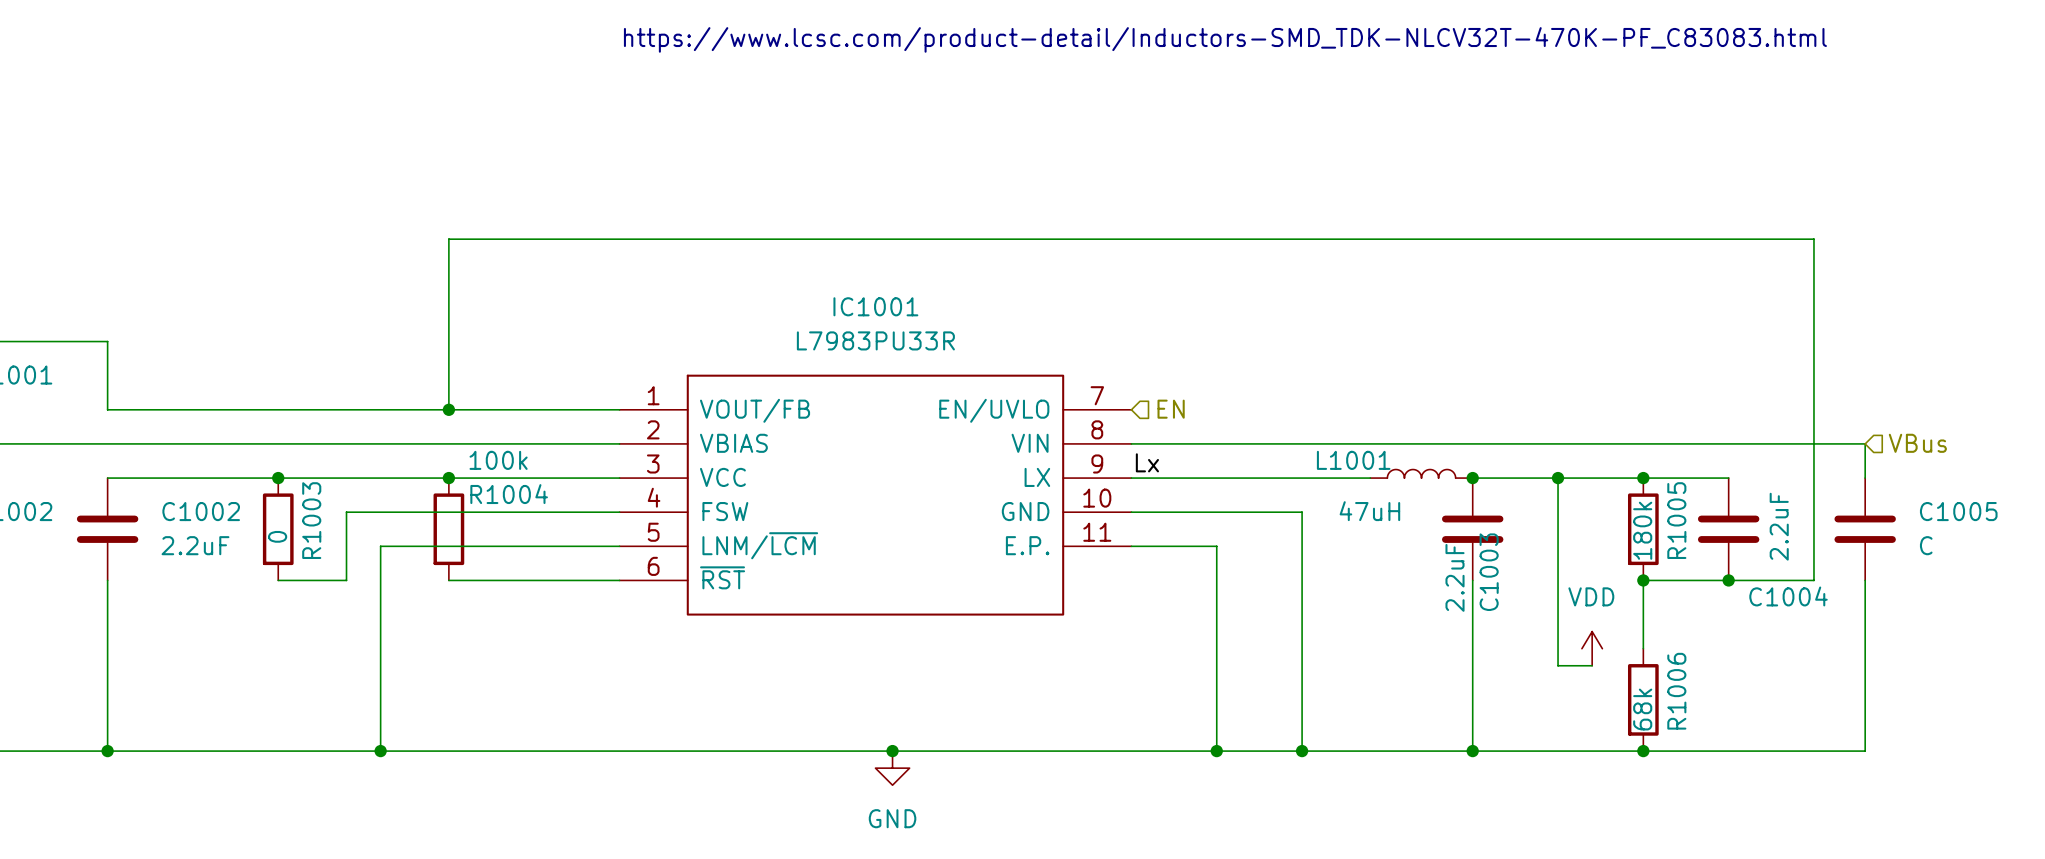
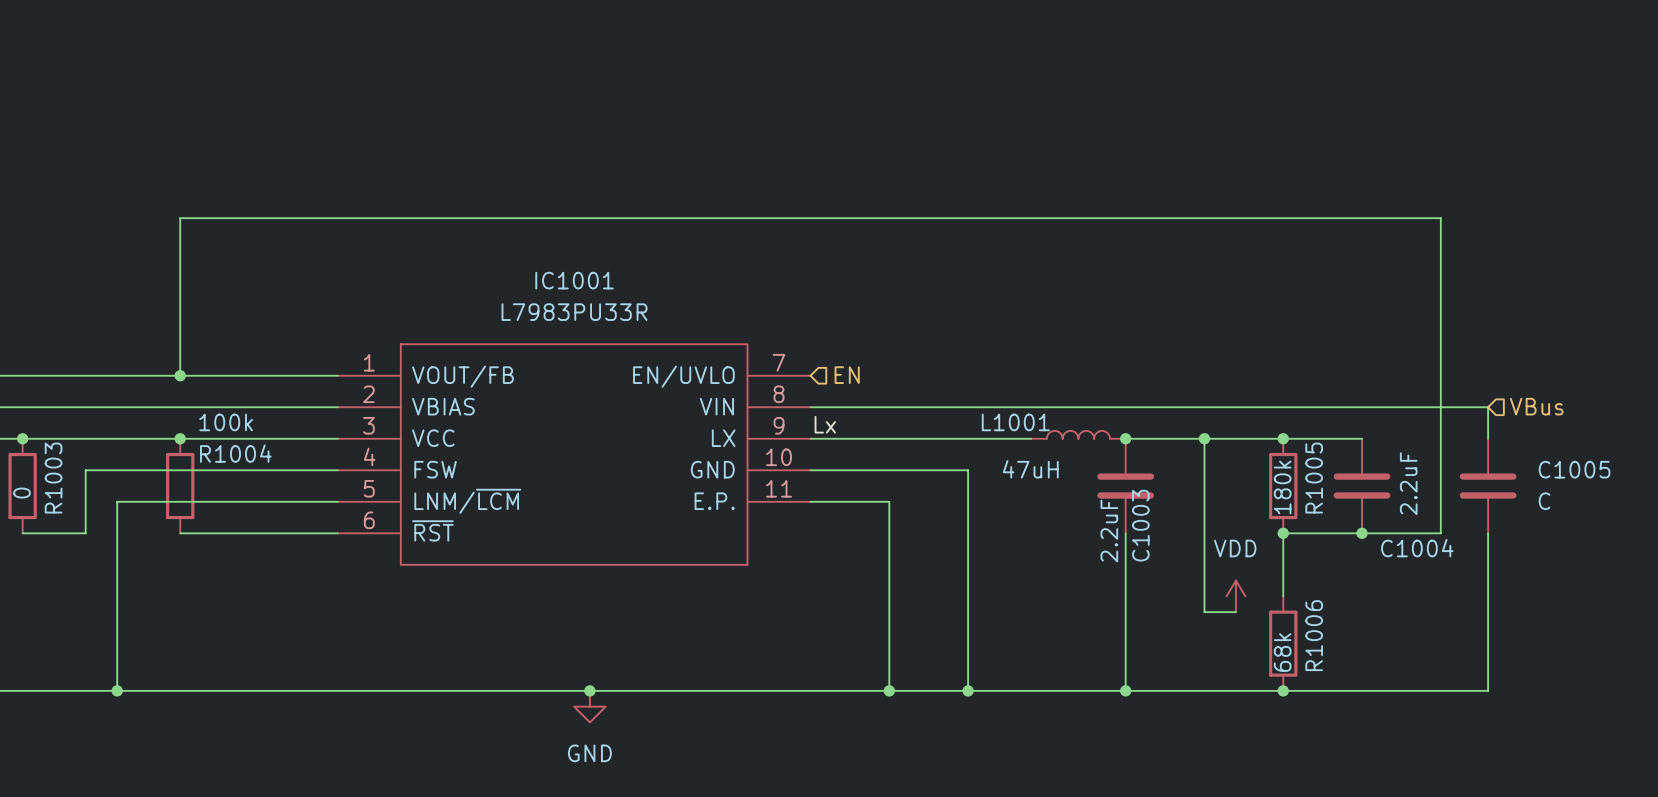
text: https://www.lcsc.com/product-detail/Inductors-SMD_TDK-NLCV32T-470K-PF_C83083.html (1225, 39) -> none

